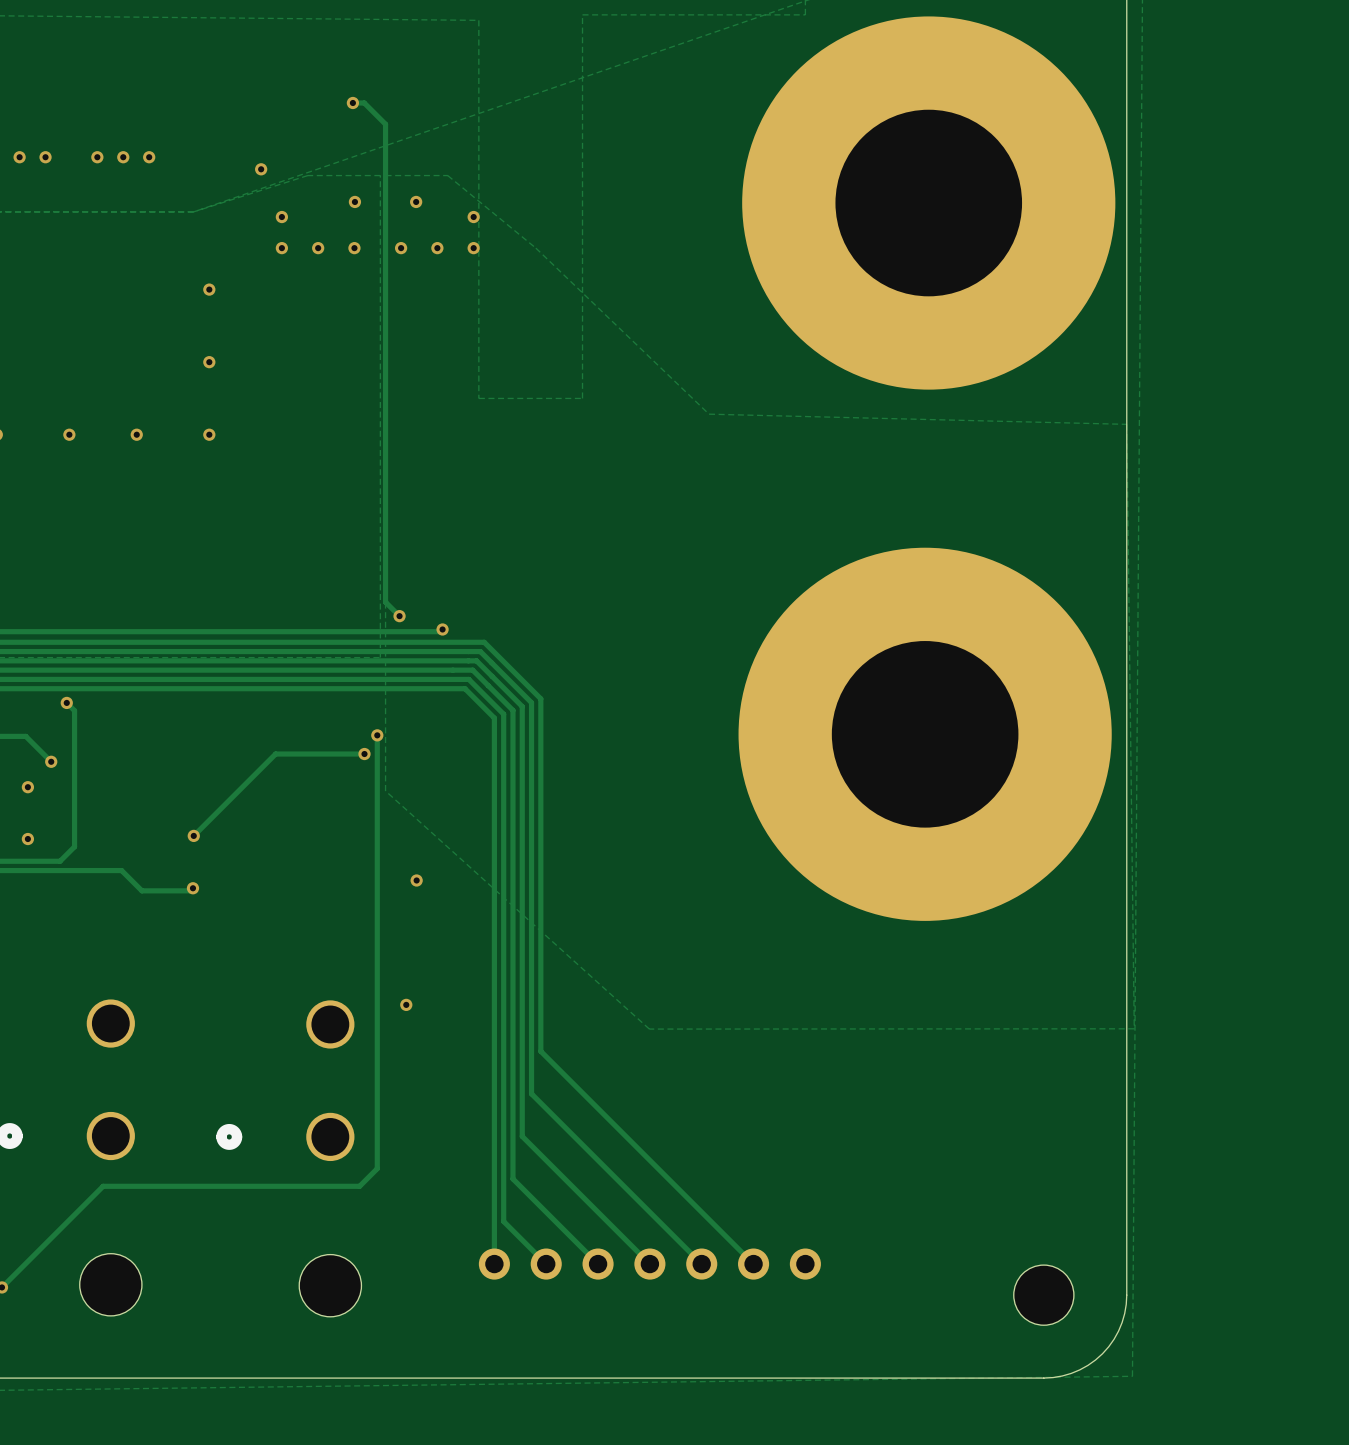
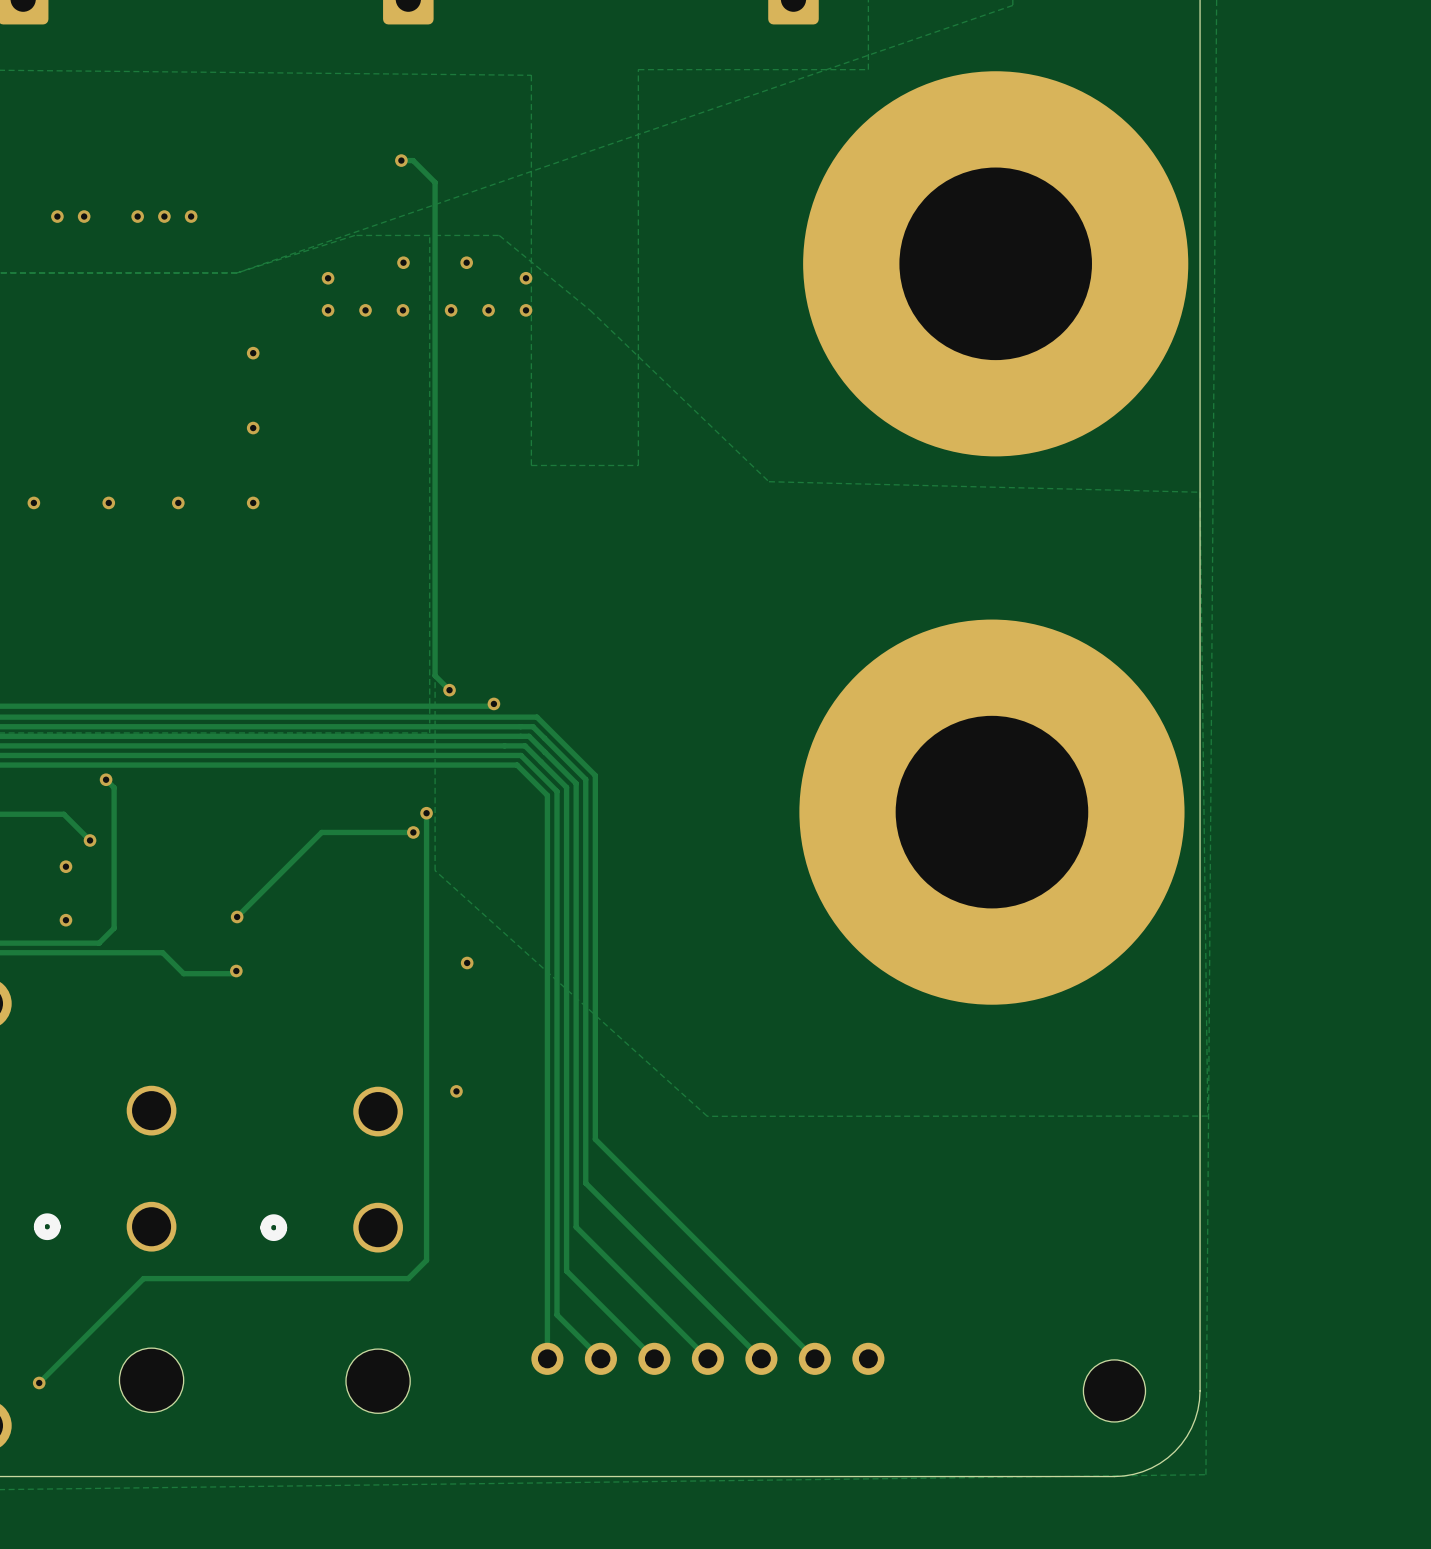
via: (261, 169) -> none

